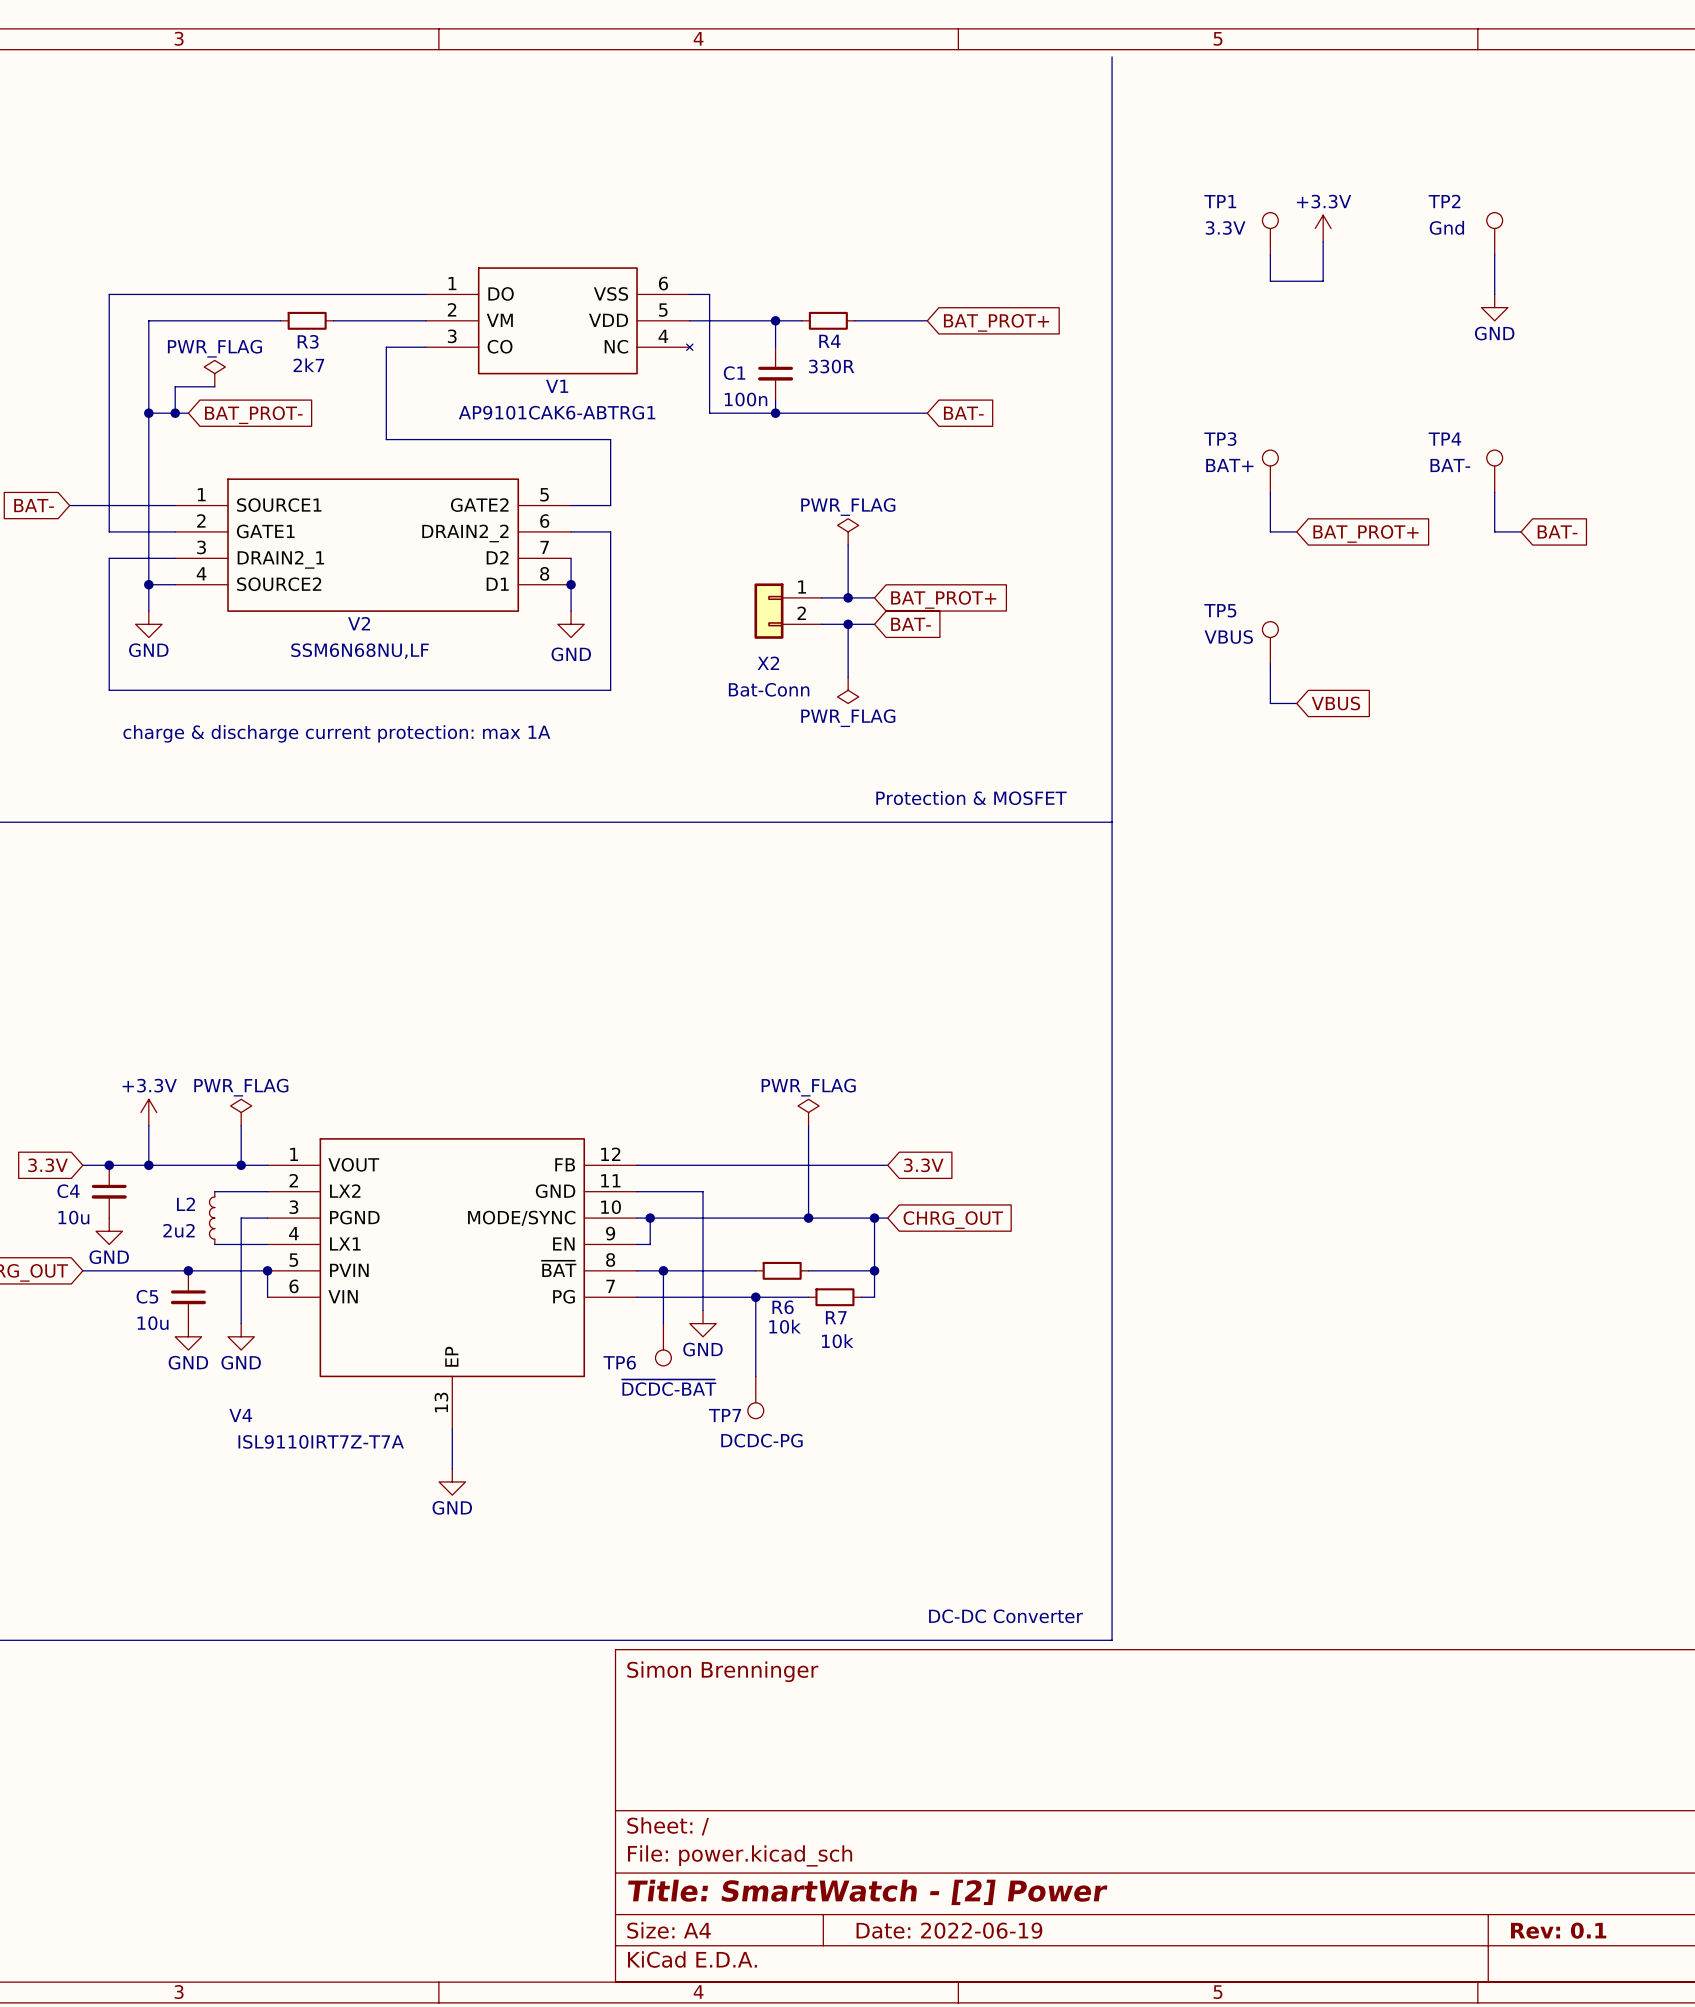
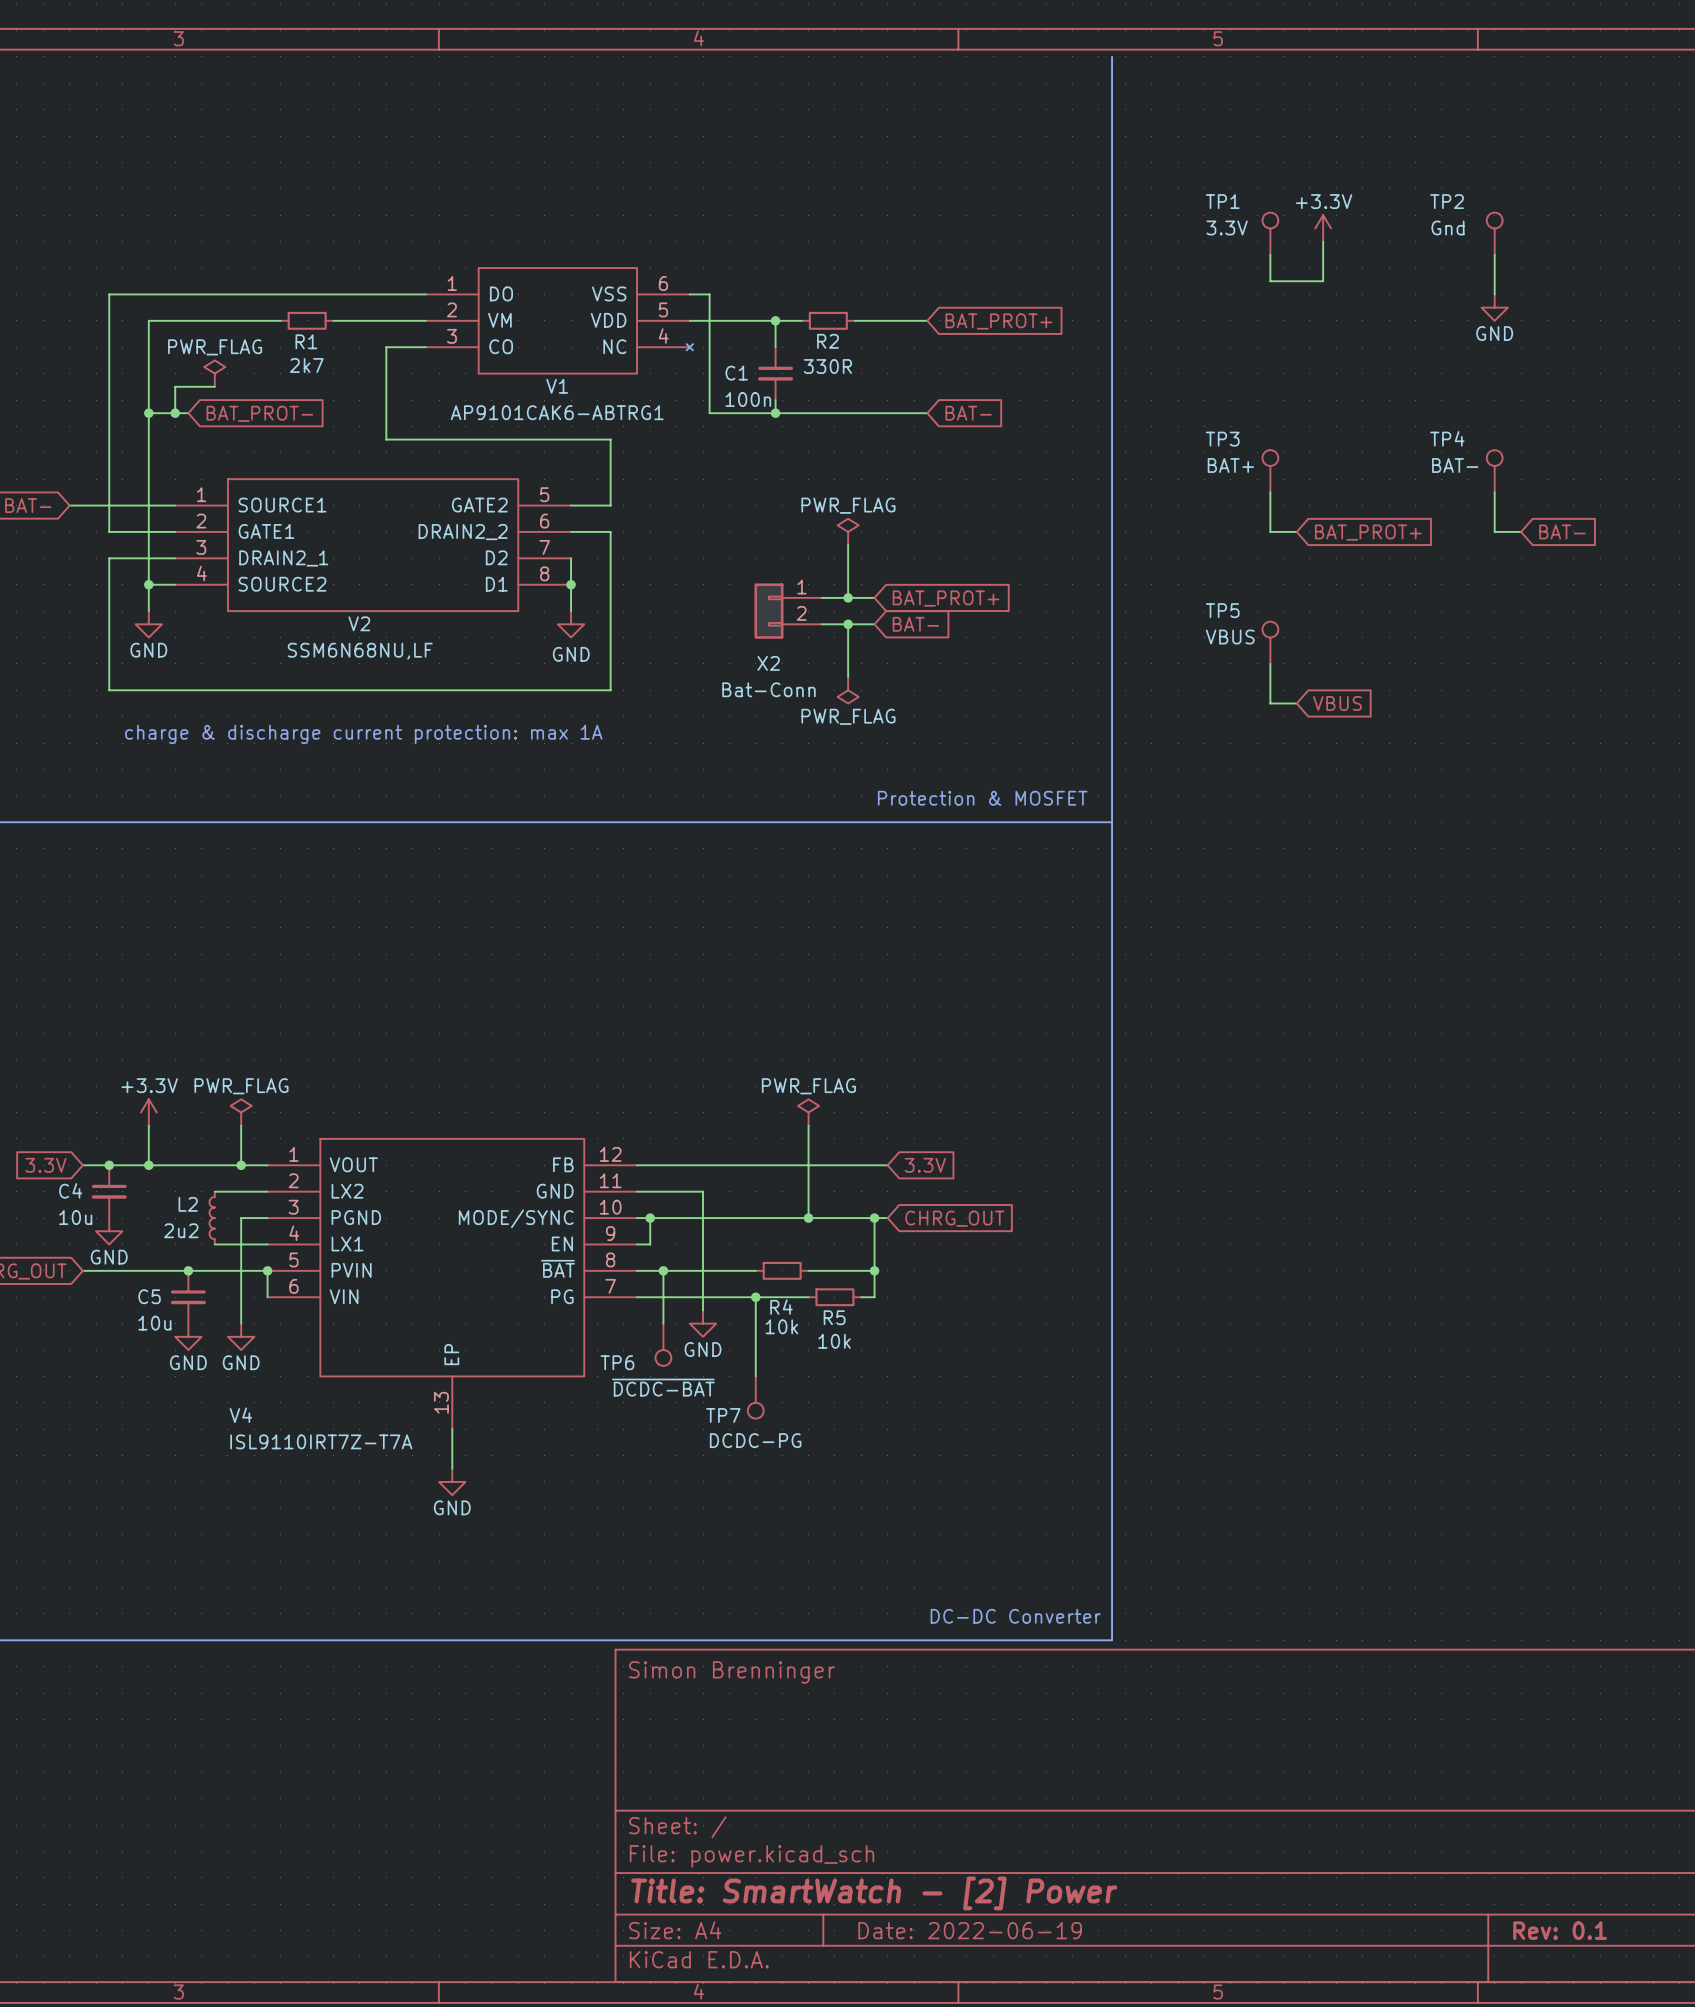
R3 name: R3 (308, 341) -> R1 (306, 341)
R4 name: R4 (829, 341) -> R2 (828, 341)
R6 name: R6 (783, 1307) -> R4 (781, 1307)
R7 name: R7 (836, 1317) -> R5 (834, 1317)

